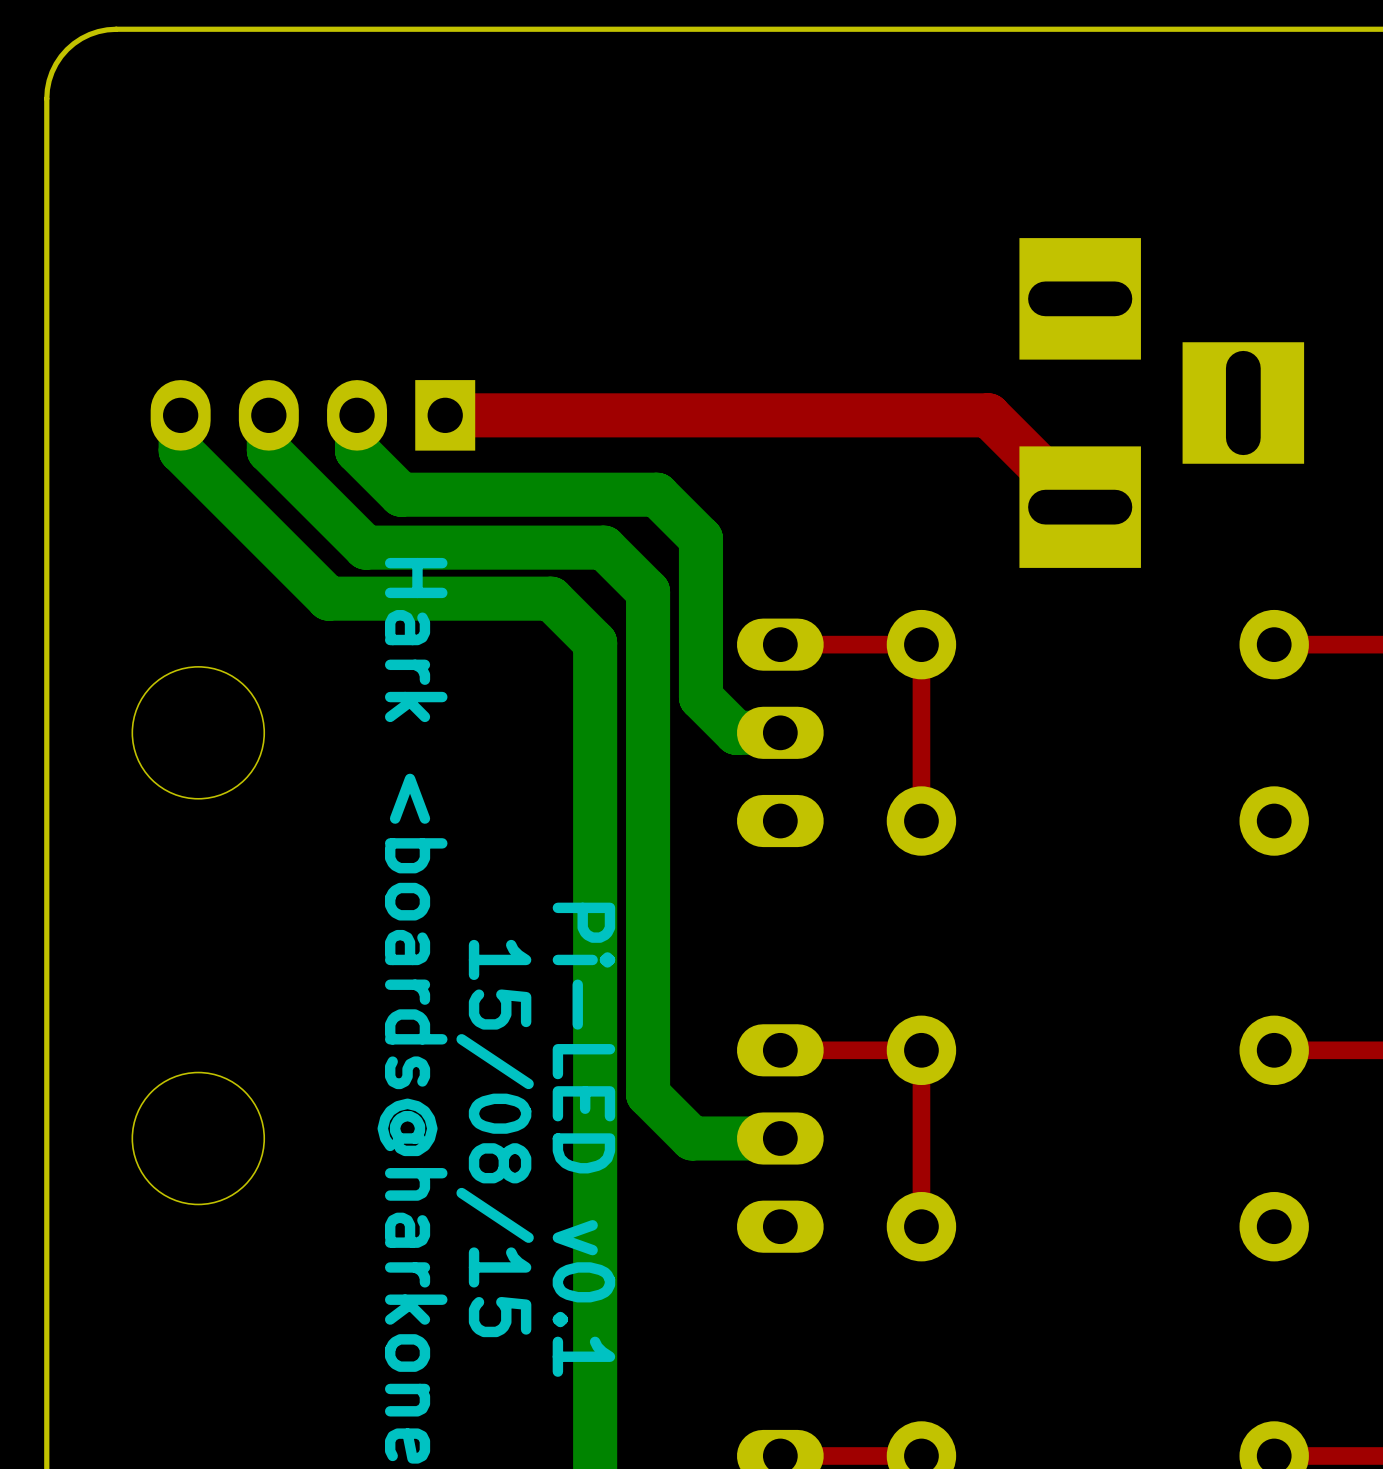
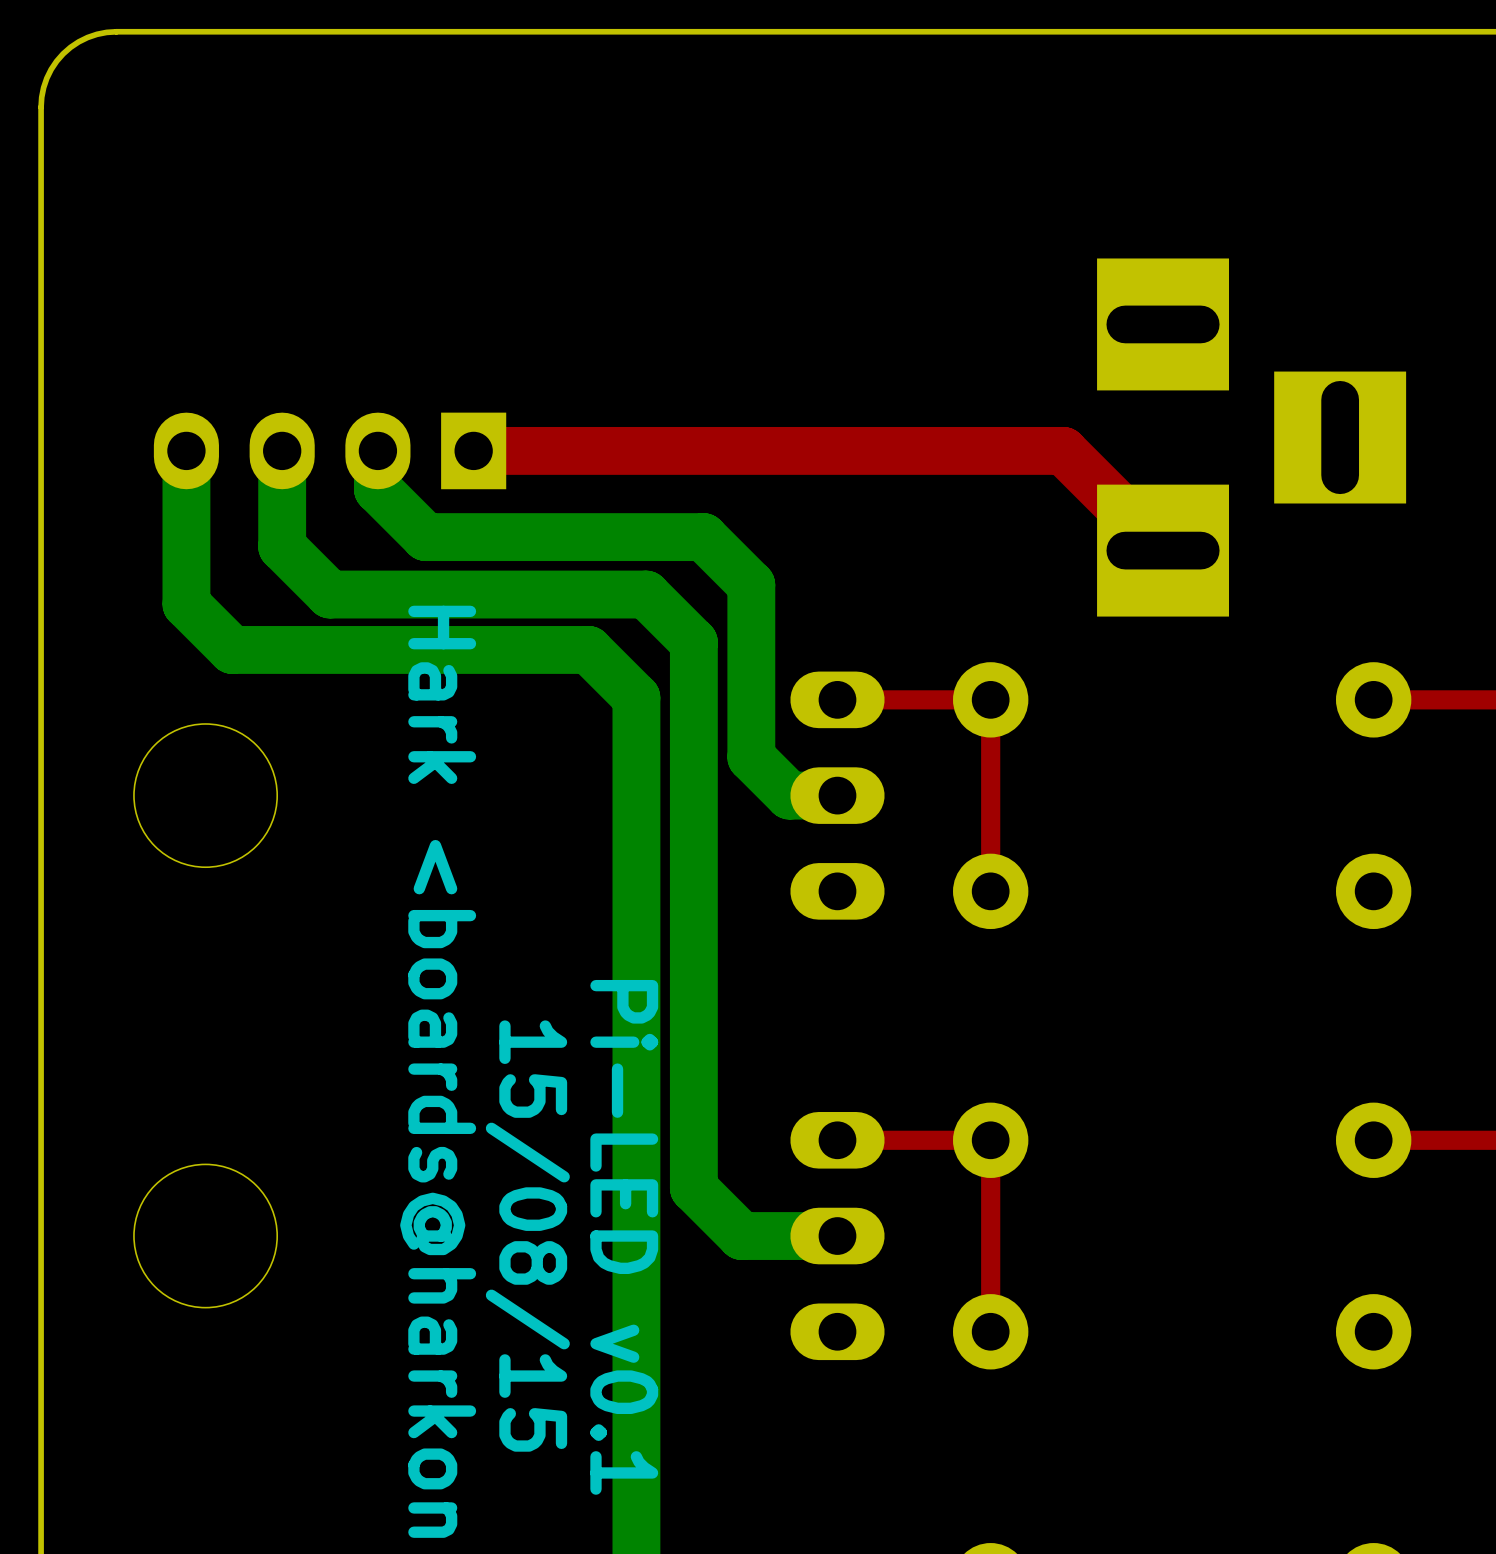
bottom track: (180, 450) (328, 598) -> (186, 489) (186, 604) (232, 649) (347, 649)
bottom track: (268, 450) (365, 547) -> (282, 489) (282, 546) (330, 594) (387, 594)

